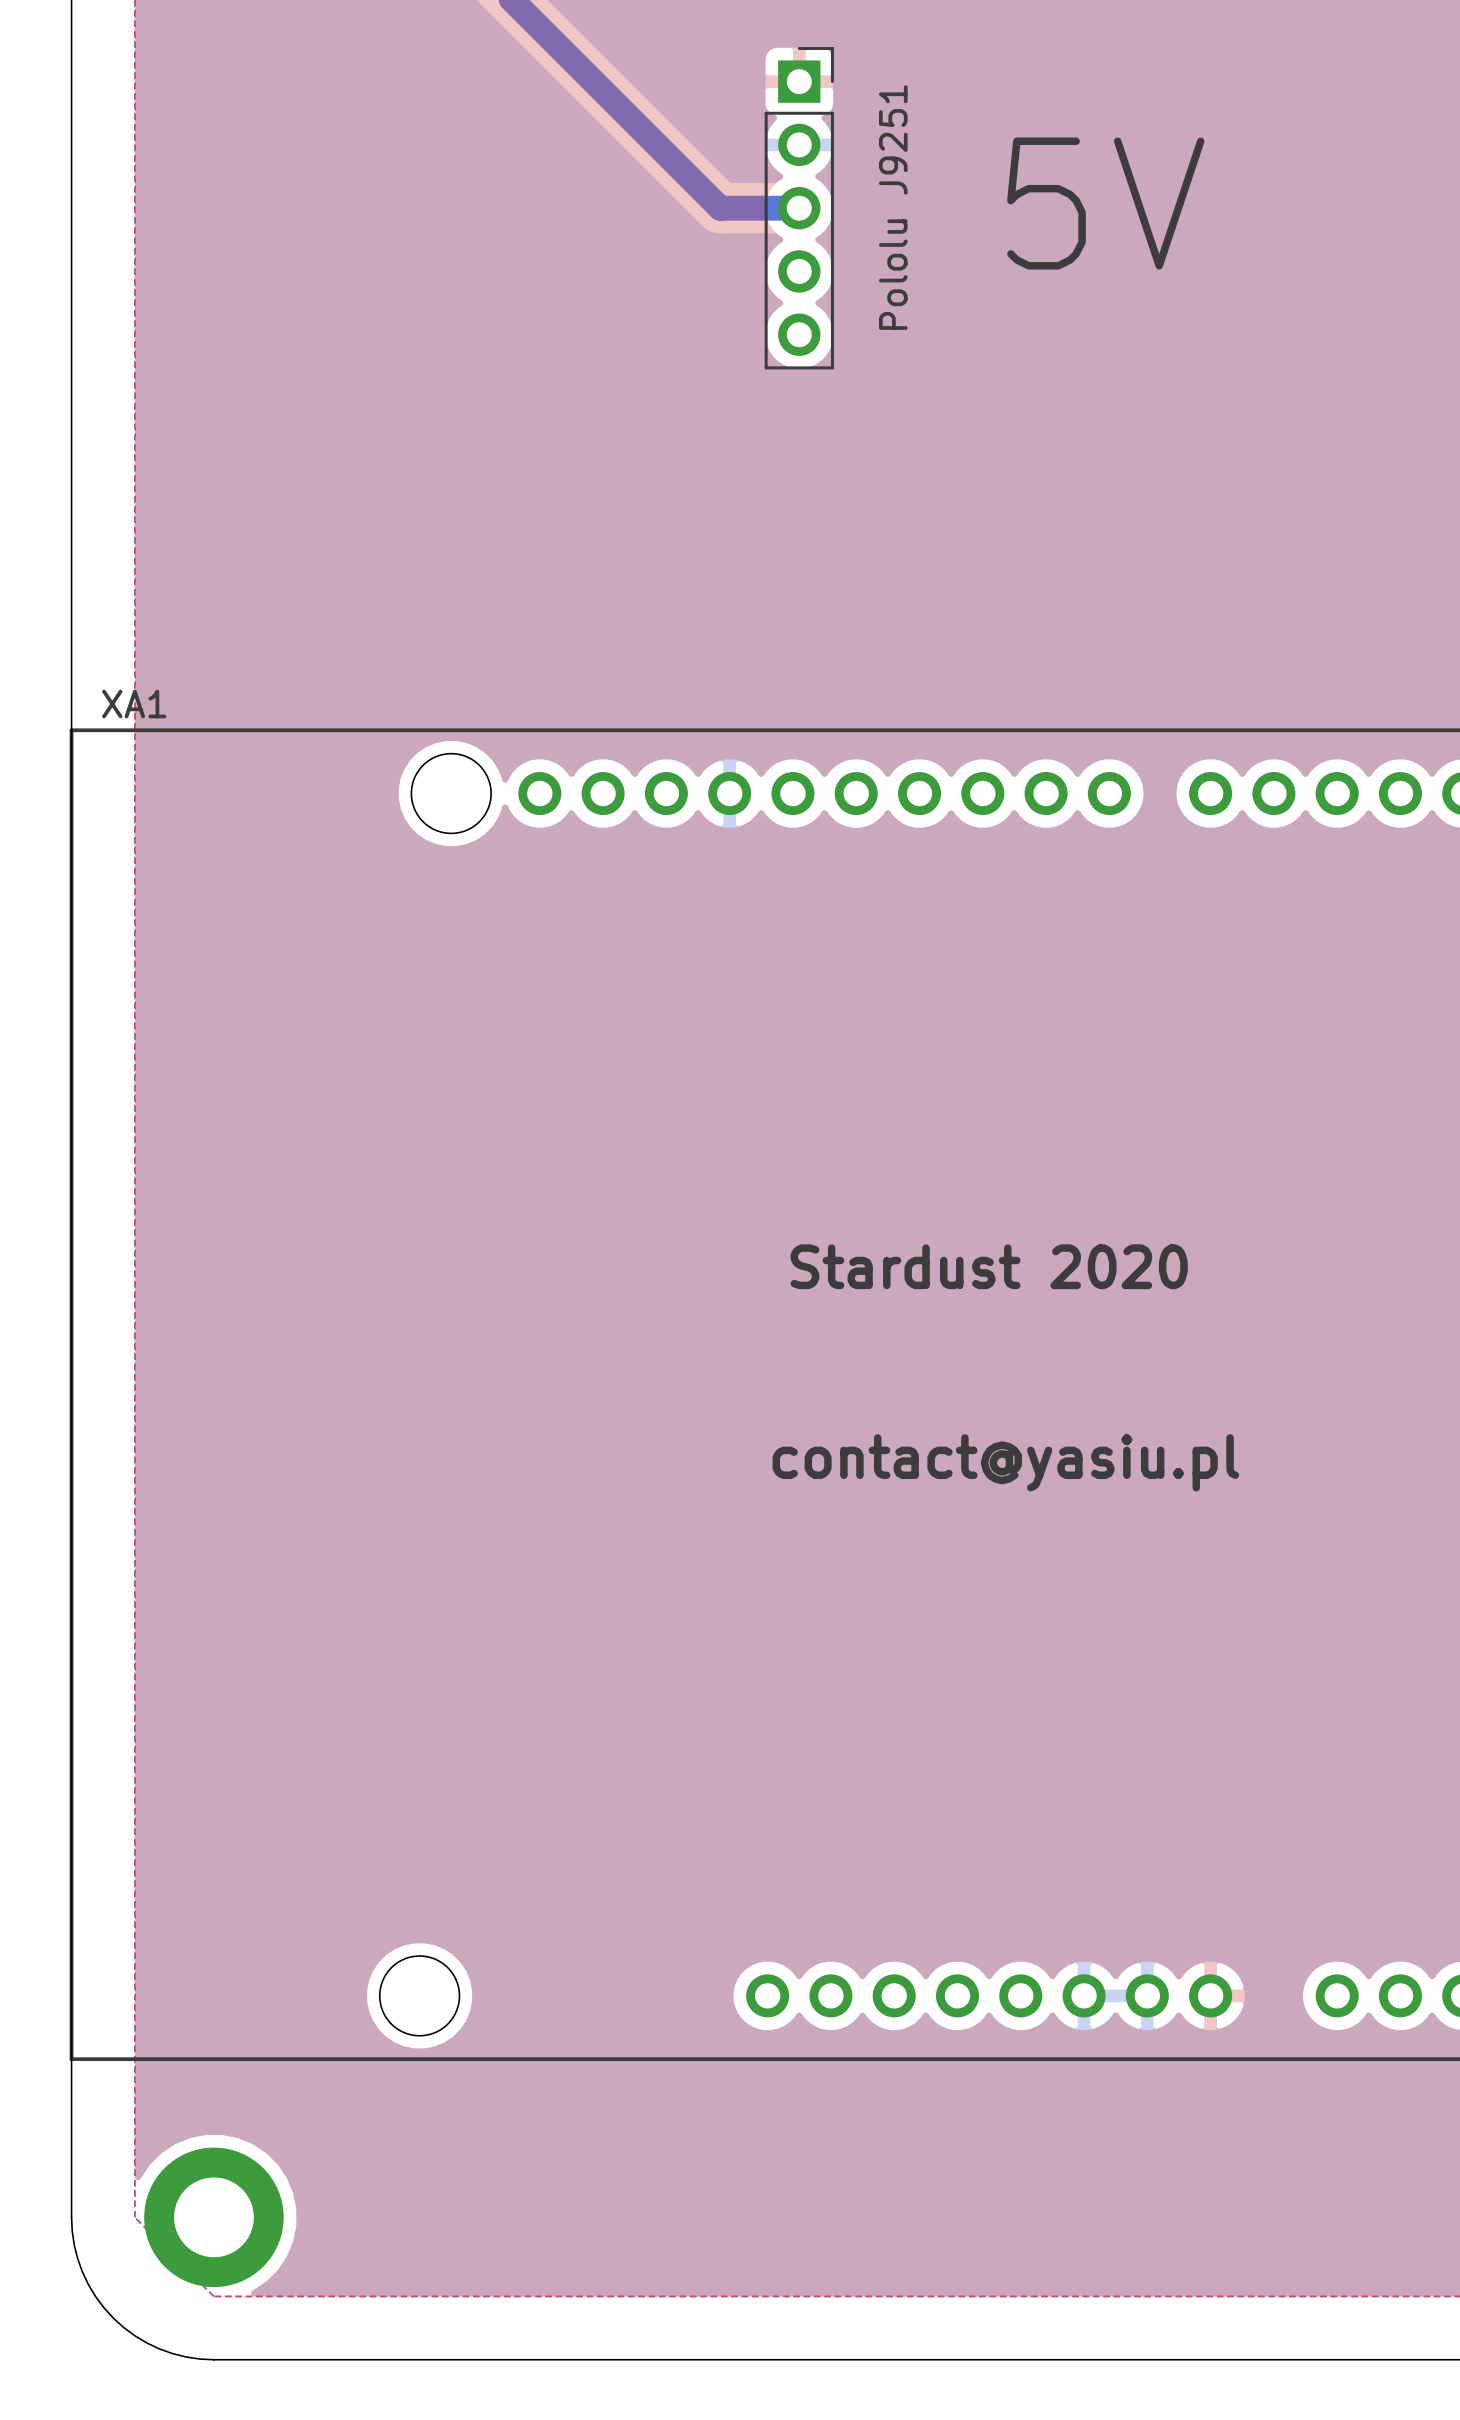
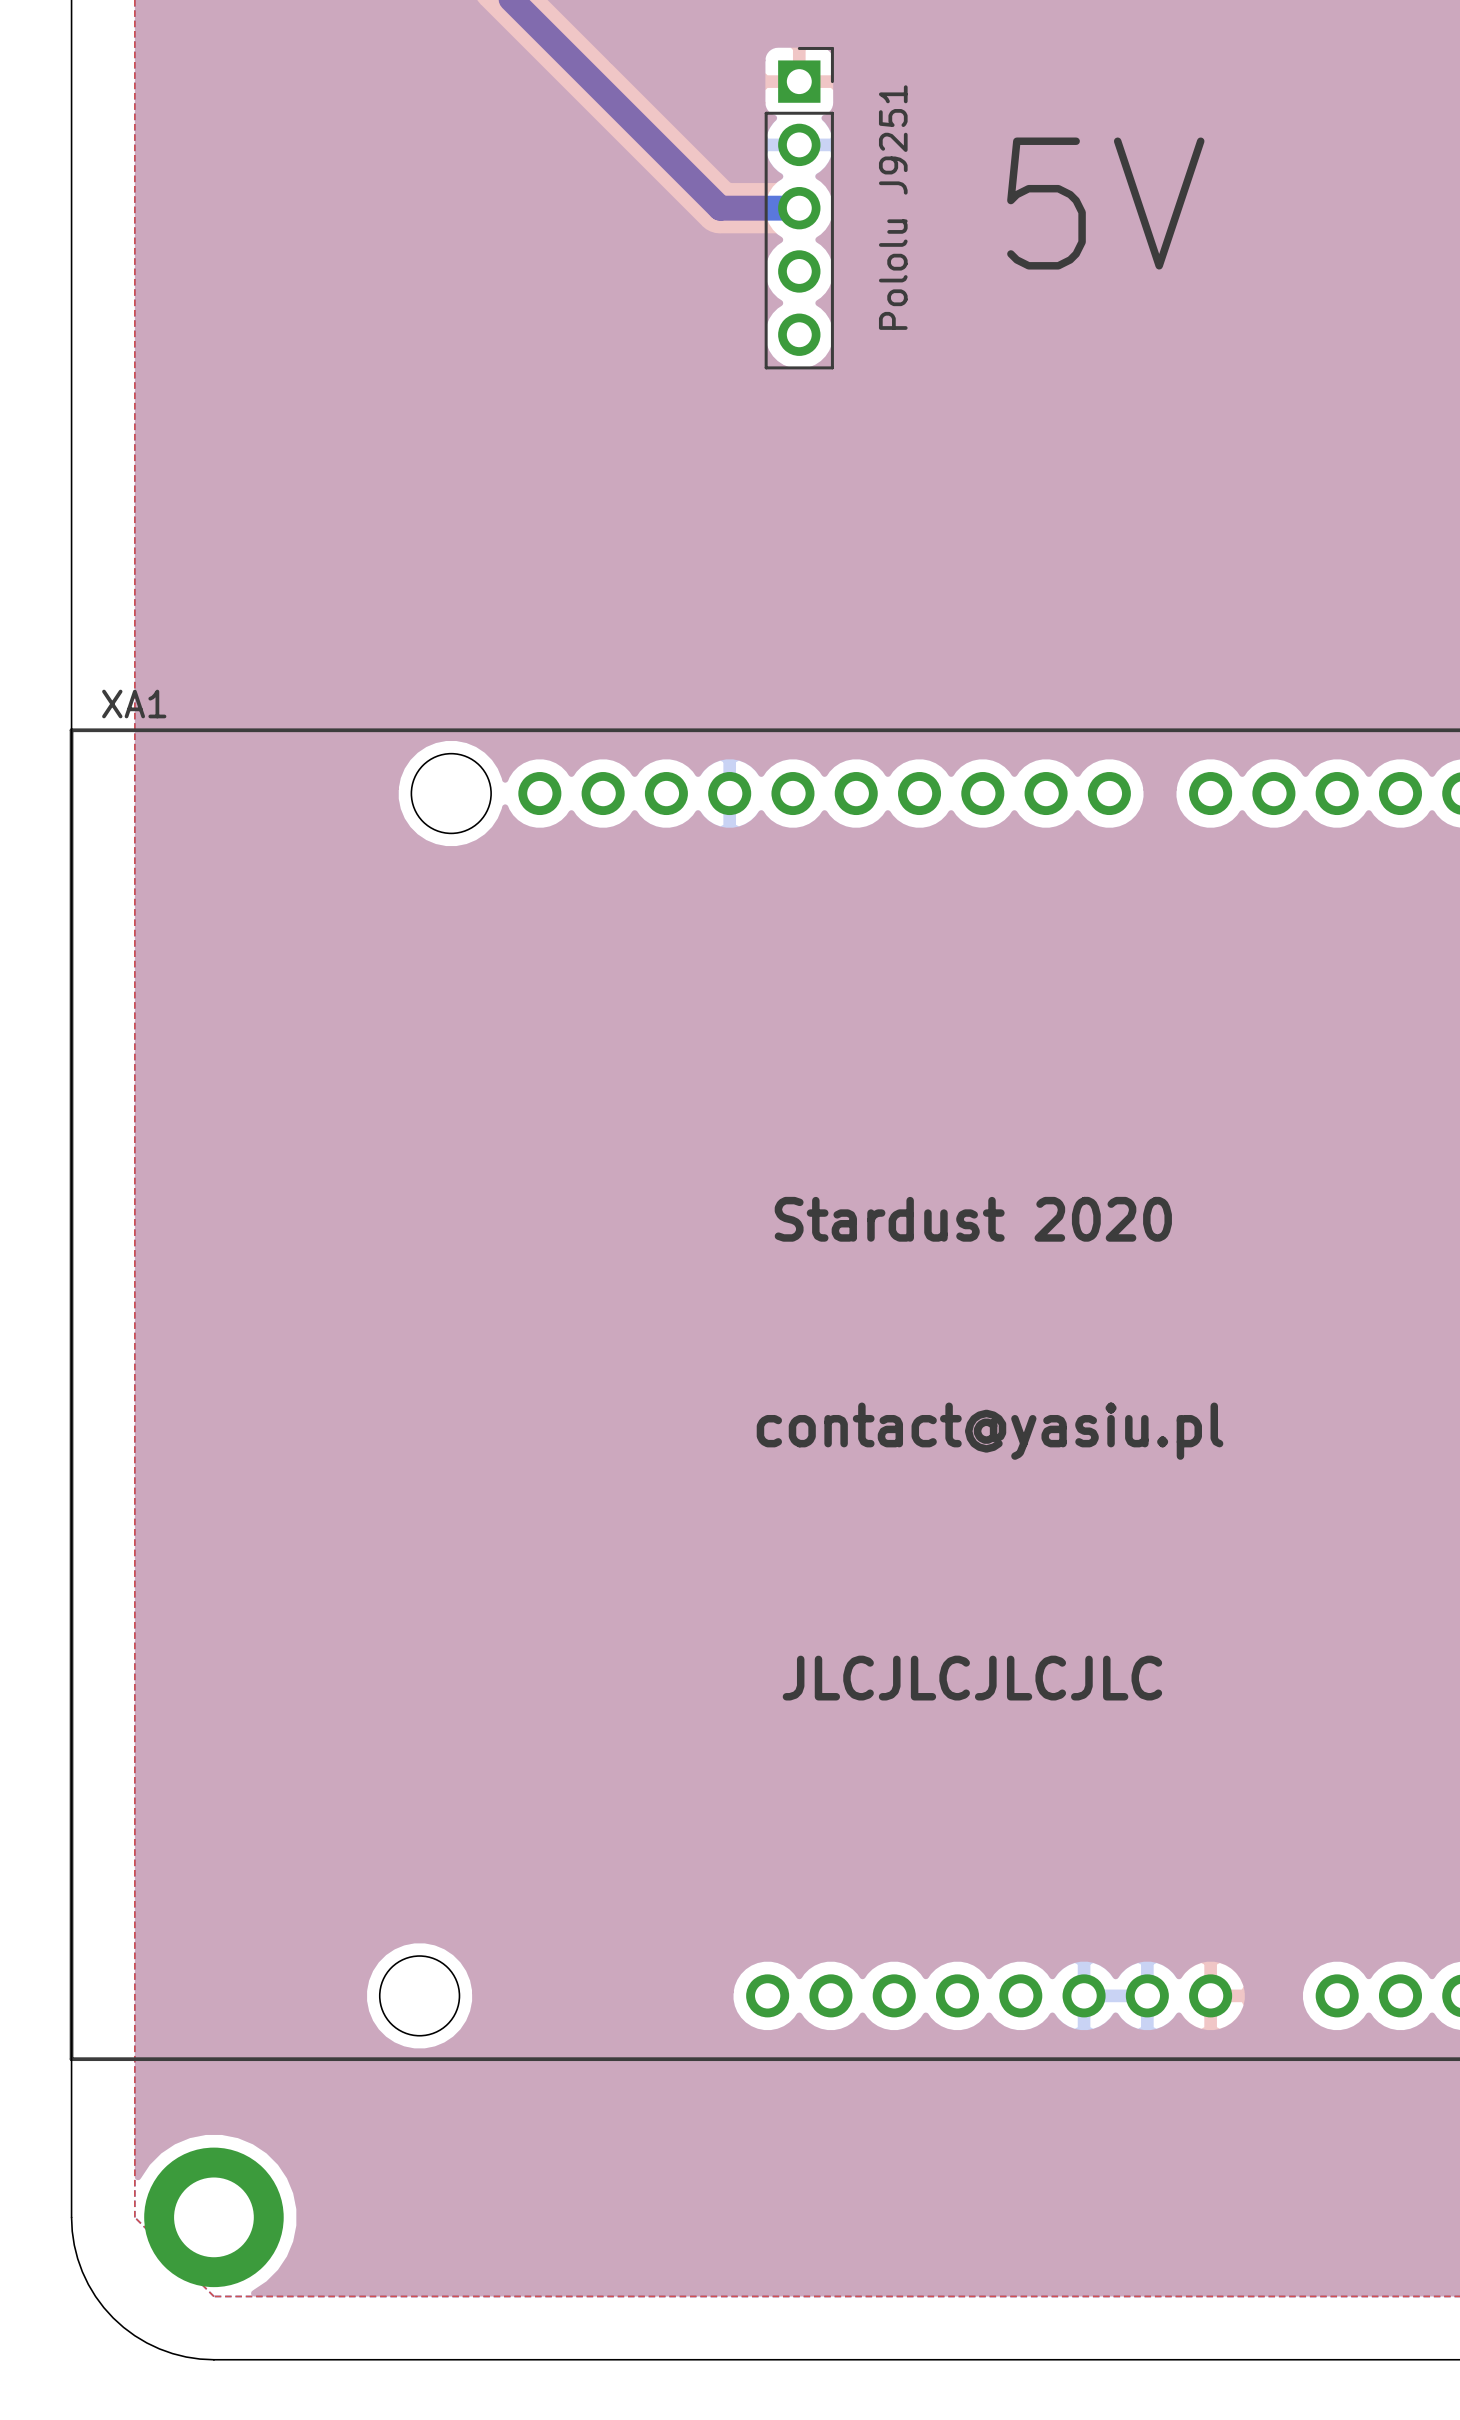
text position: Stardust 2020 (989, 1266) -> Stardust 2020 (973, 1219)
text position: contact@yasiu.pl (1005, 1462) -> contact@yasiu.pl (990, 1431)
text: none -> JLCJLCJLCJLC (972, 1678)

